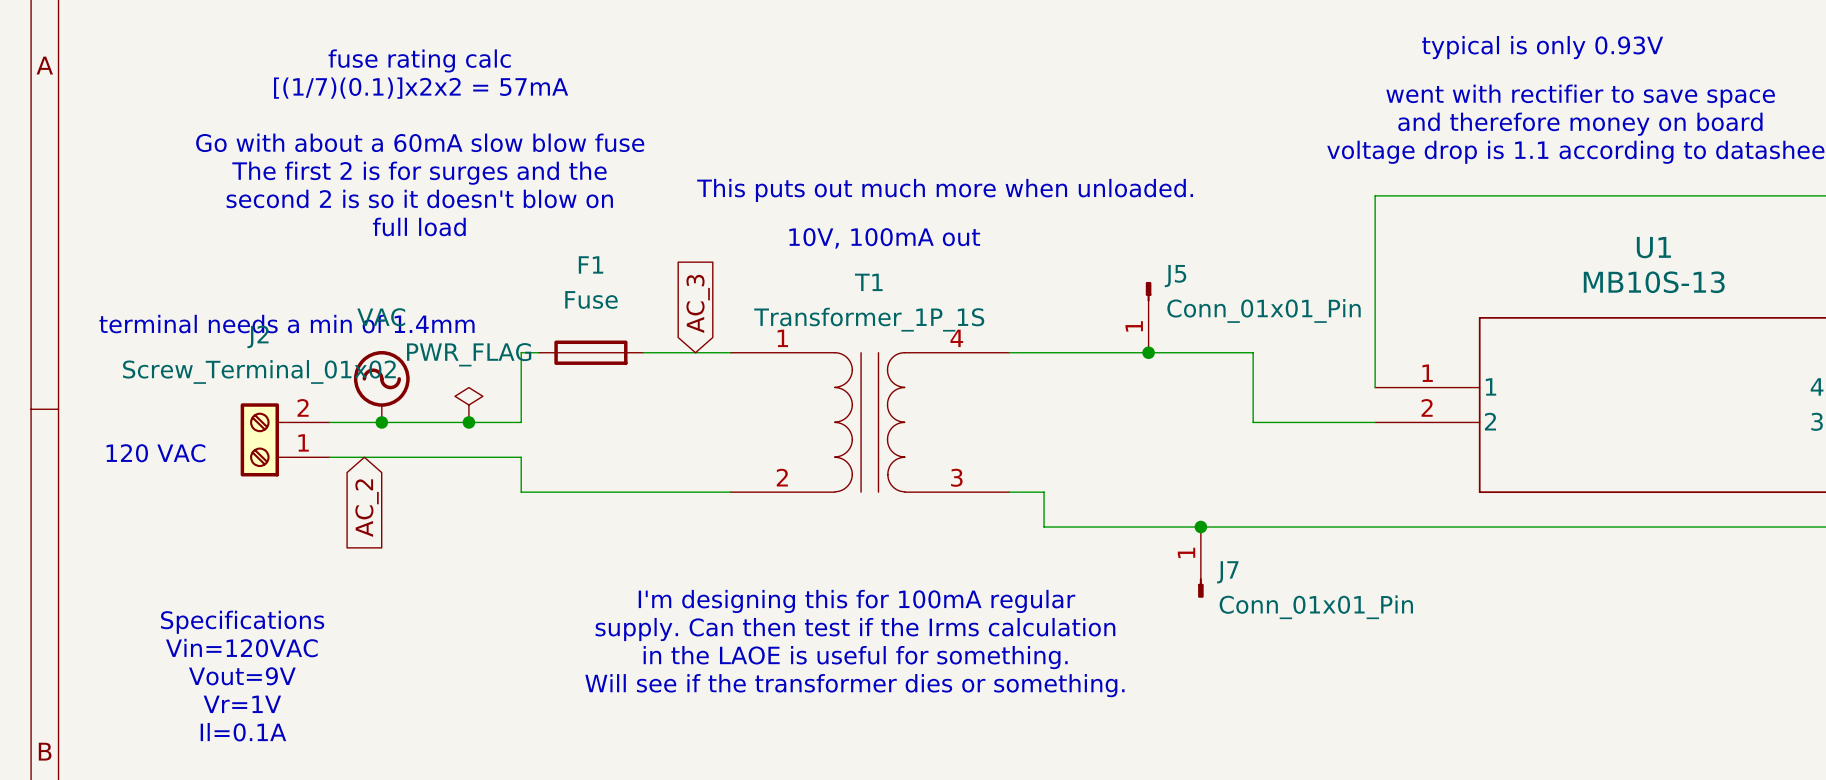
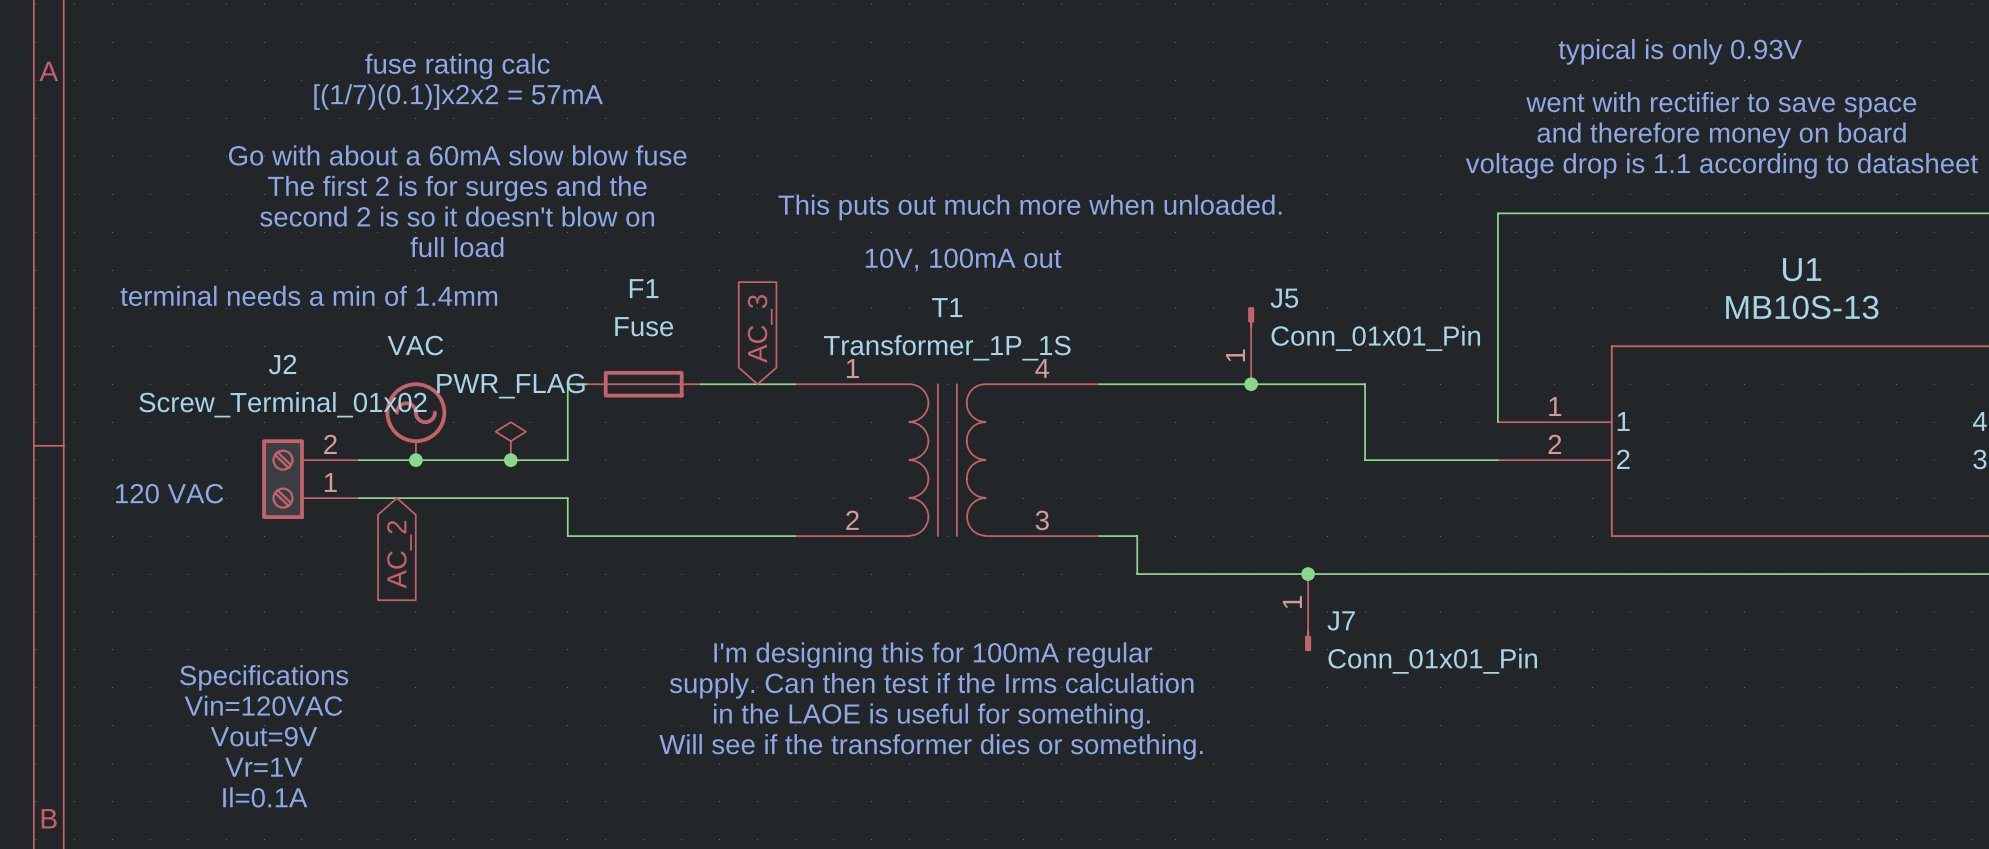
text position: terminal needs a min of 1.4mm (287, 324) -> terminal needs a min of 1.4mm (308, 295)

